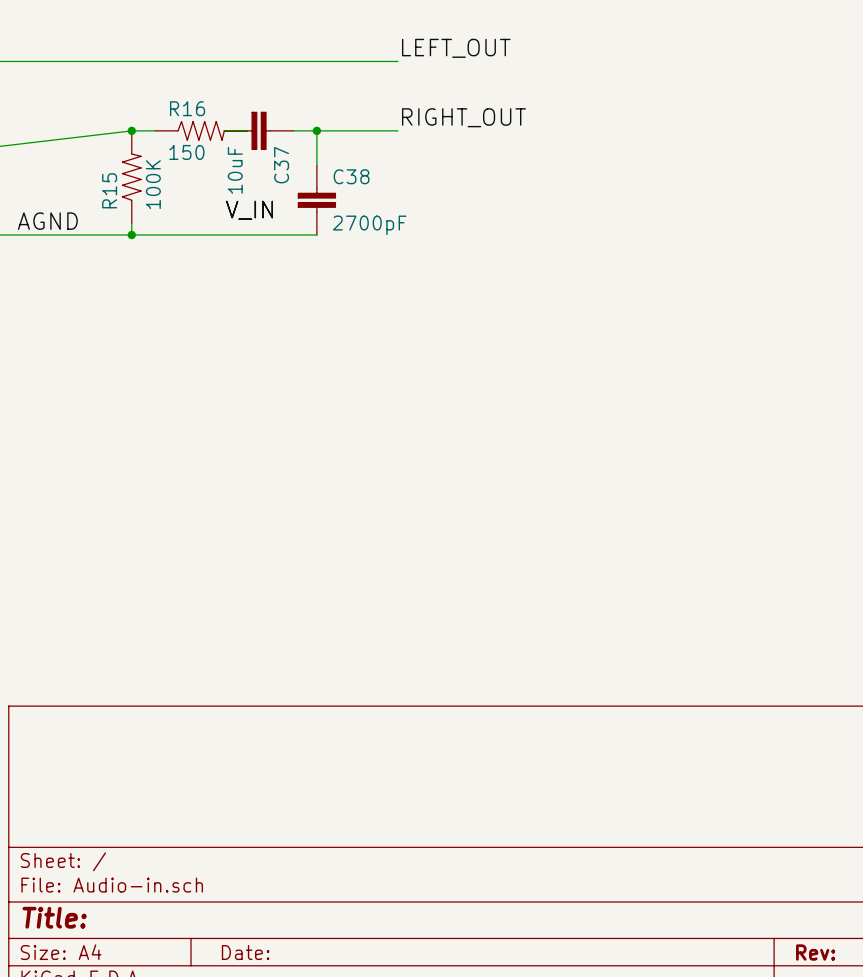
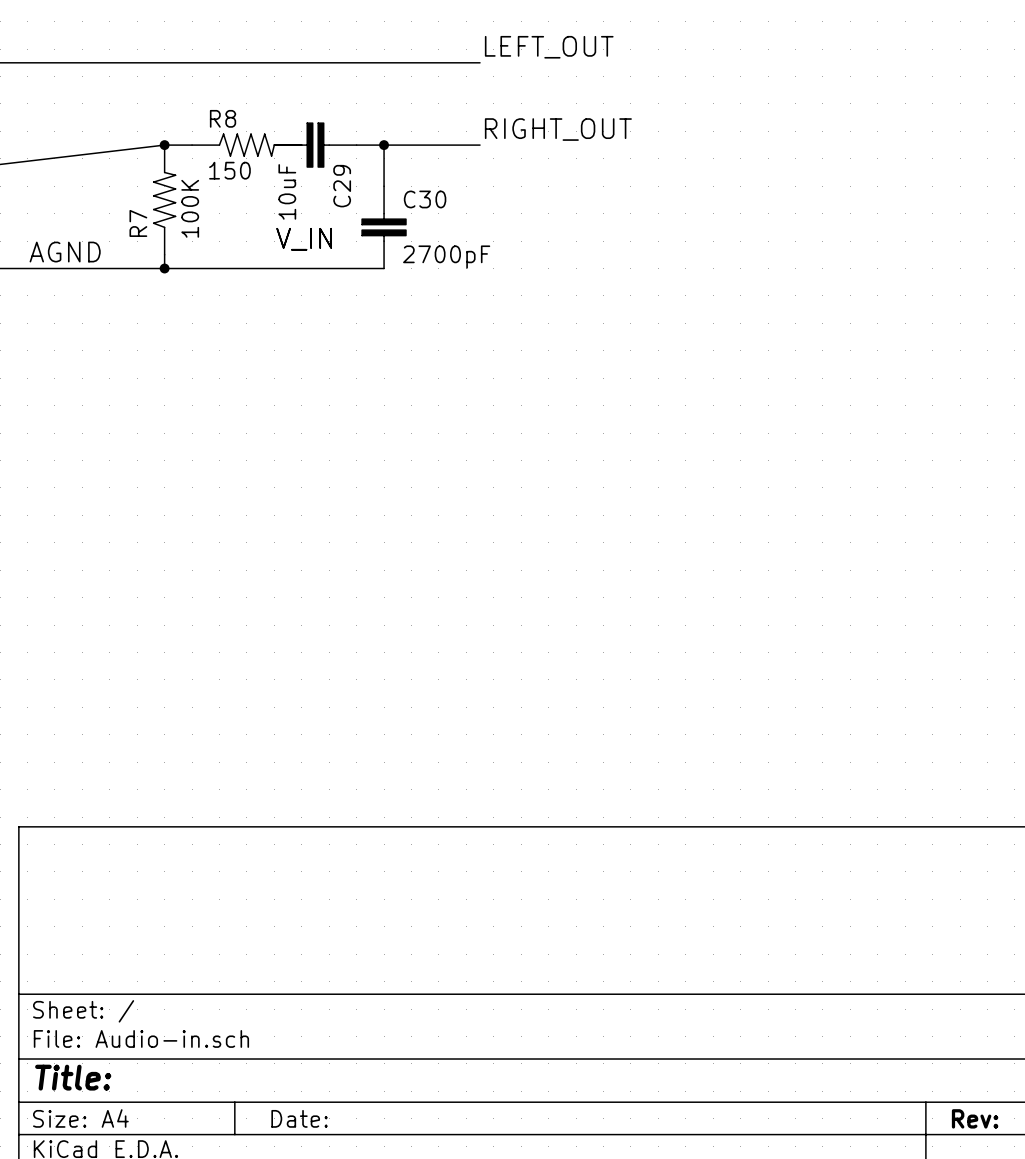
R16 name: R16 (187, 108) -> R8 (223, 118)
C37 name: C37 (281, 165) -> C29 (342, 186)
C38 name: C38 (351, 176) -> C30 (425, 199)
R15 name: R15 (109, 190) -> R7 (138, 223)

